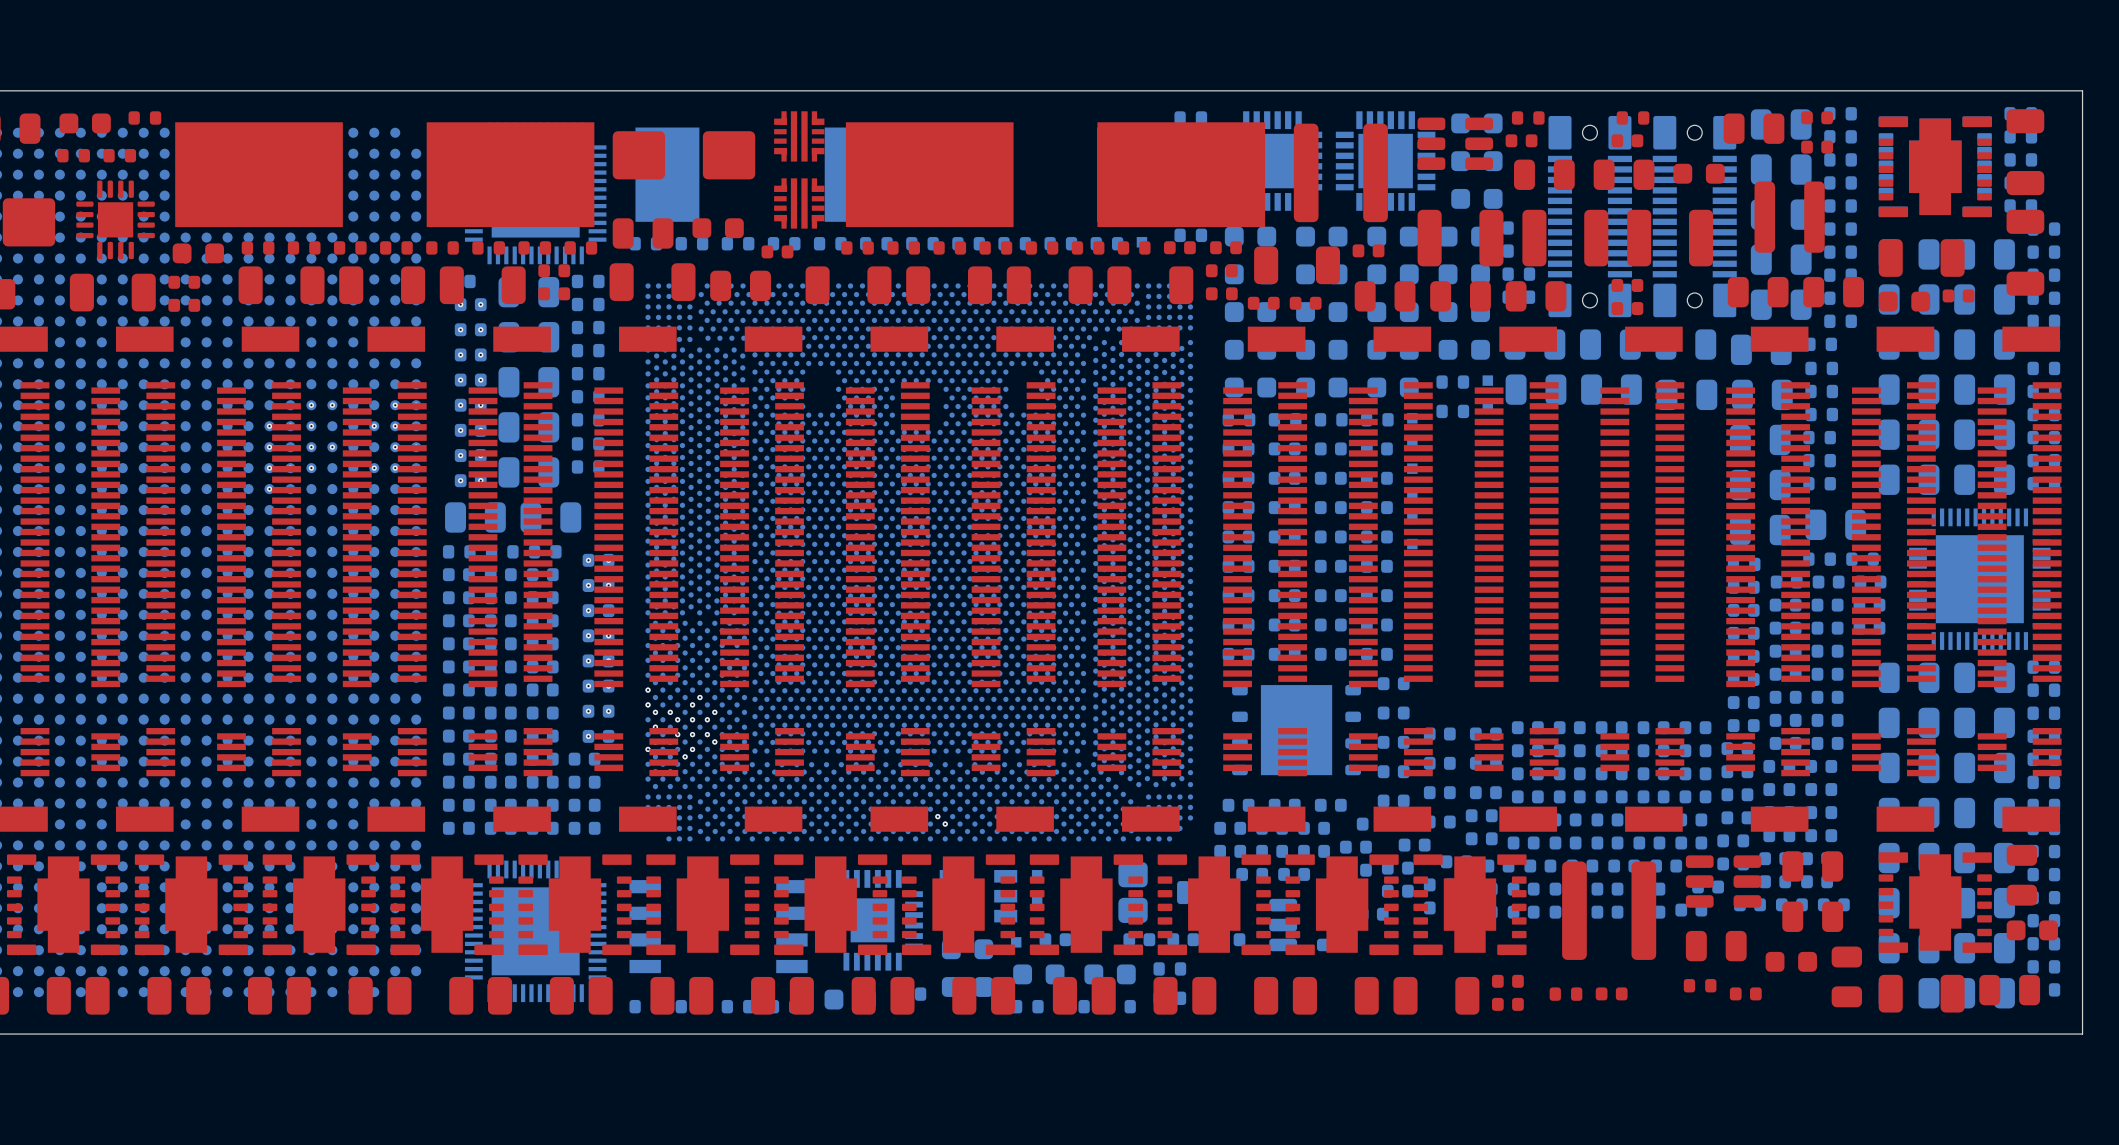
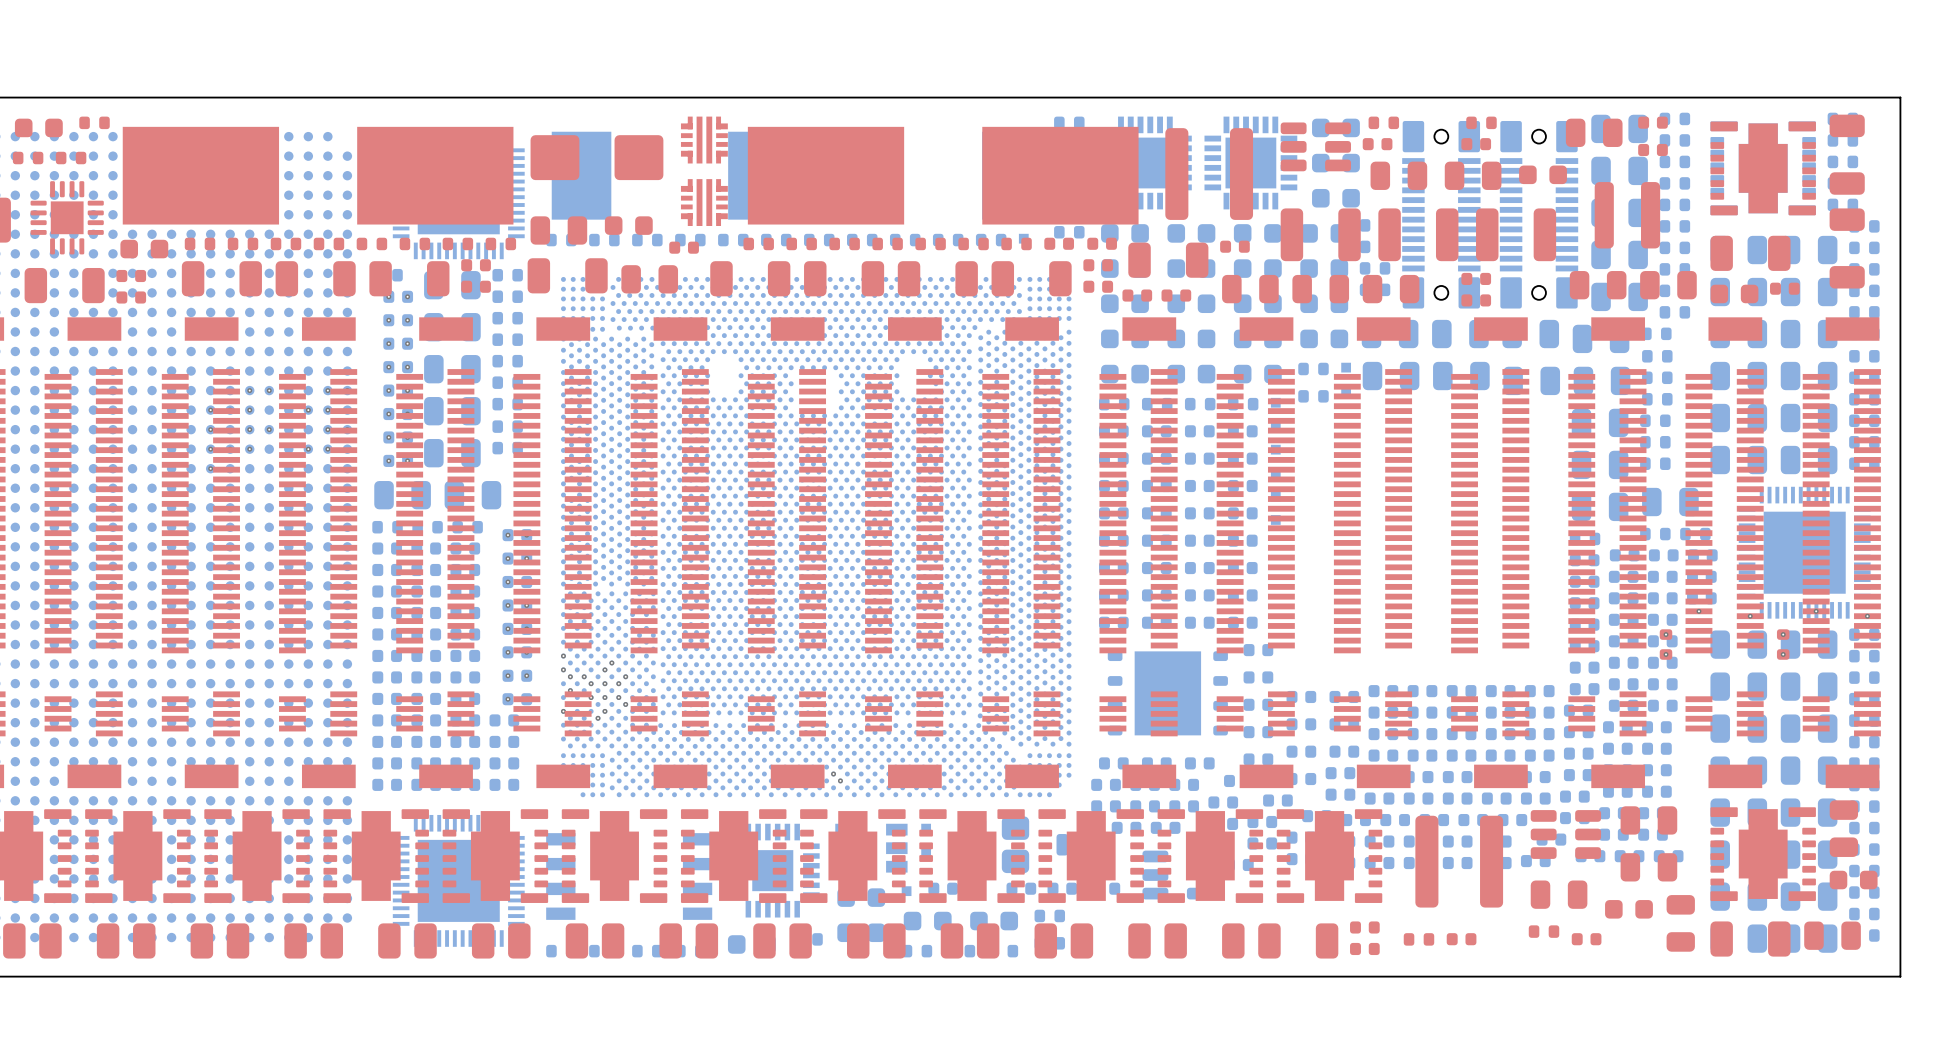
via: none -> (1698, 611)
via: none -> (1816, 611)
via: none -> (1750, 616)
via: none -> (1867, 616)
via: none -> (1666, 634)
via: none -> (1783, 634)
part: none -> (1666, 644)
part: none -> (1783, 644)
via: none -> (1666, 654)
via: none -> (1783, 654)

